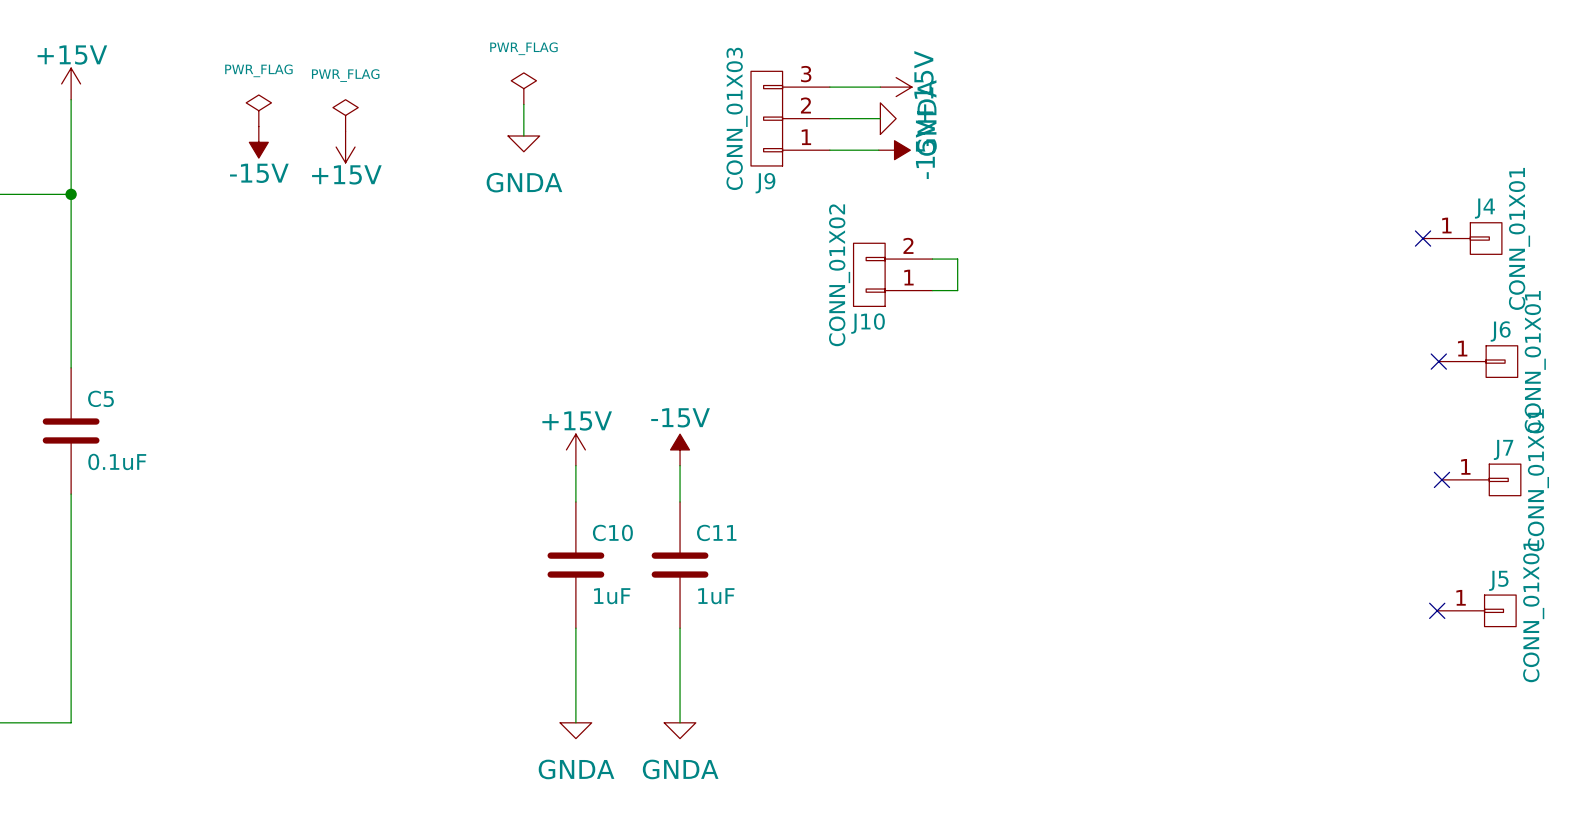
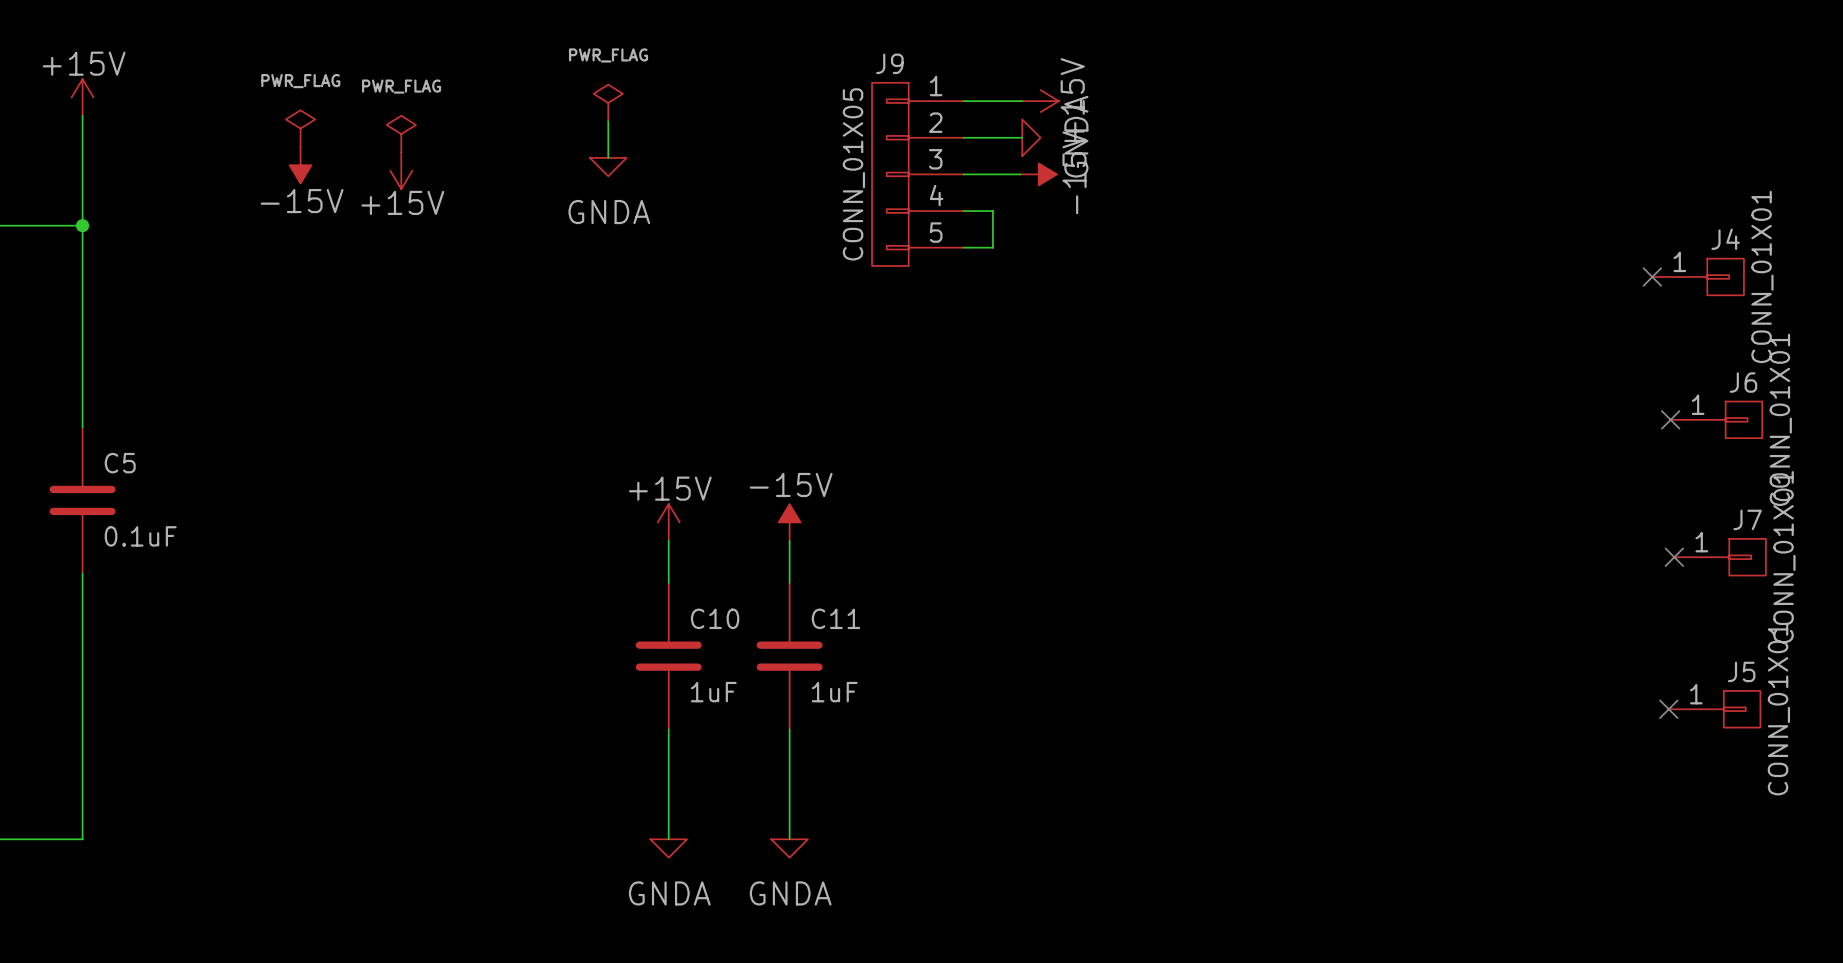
J9 symbol: [751, 71, 830, 166] -> [872, 82, 964, 266]
J9 value: CONN_01X03 (737, 118) -> CONN_01X05 (853, 174)
J9 name position: J9 (765, 183) -> J9 (889, 63)
wire: (932, 259) (957, 259) (957, 290) (932, 290) -> (963, 211) (992, 211) (992, 247) (963, 247)
J10: CONN_01X02 (892, 274) -> none

